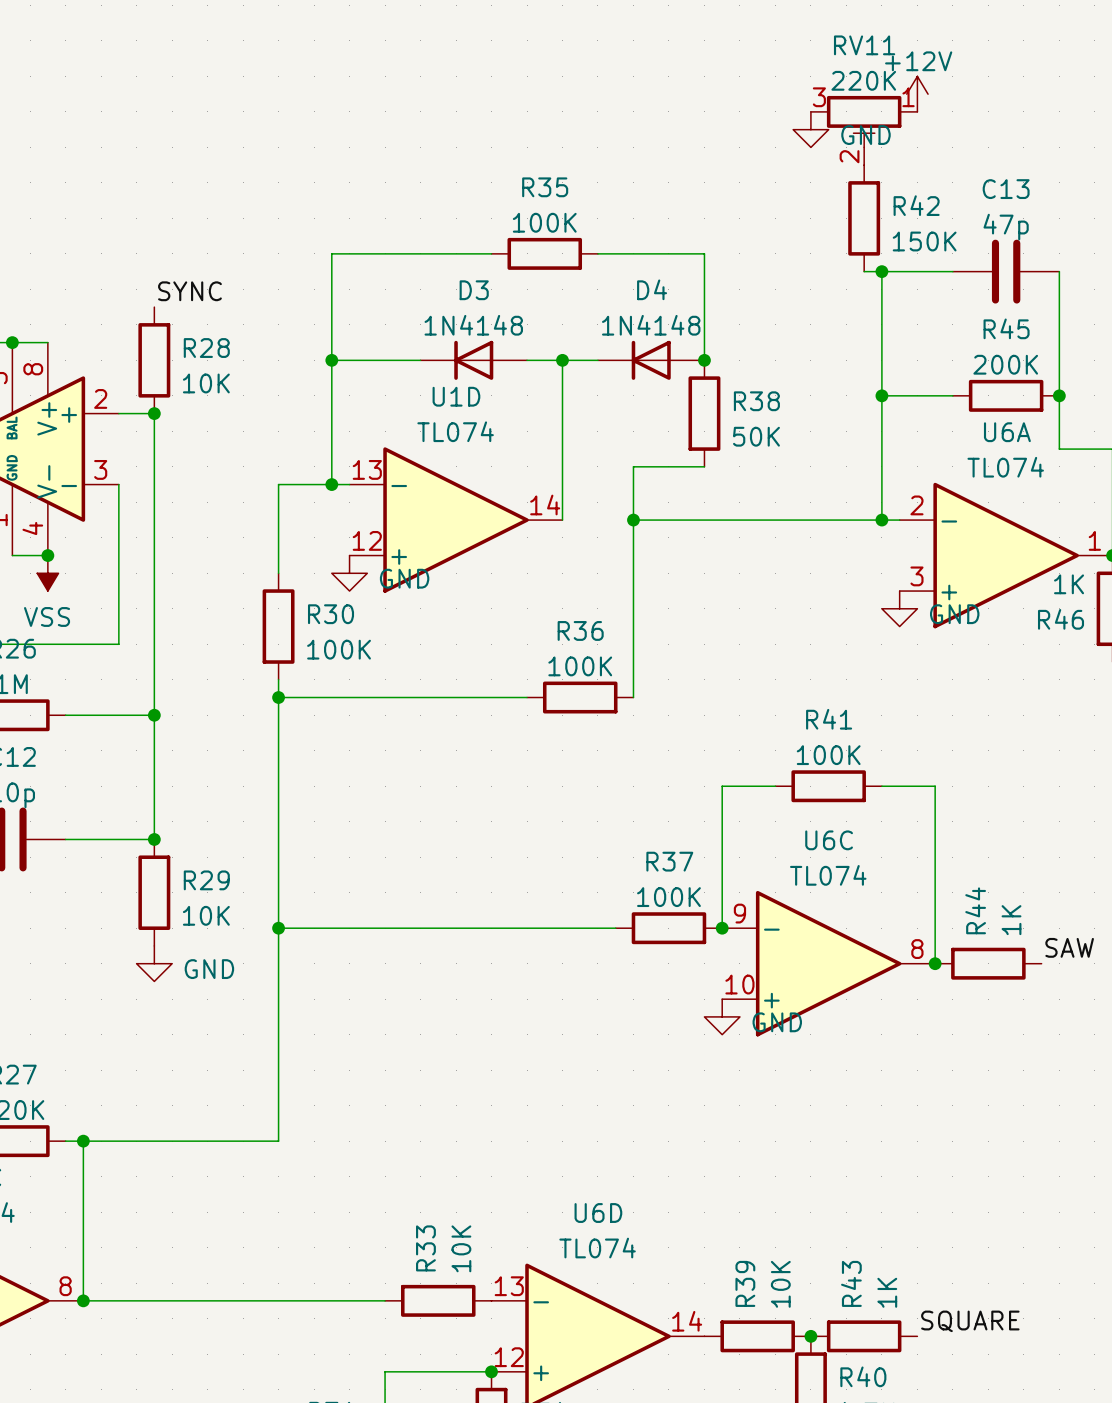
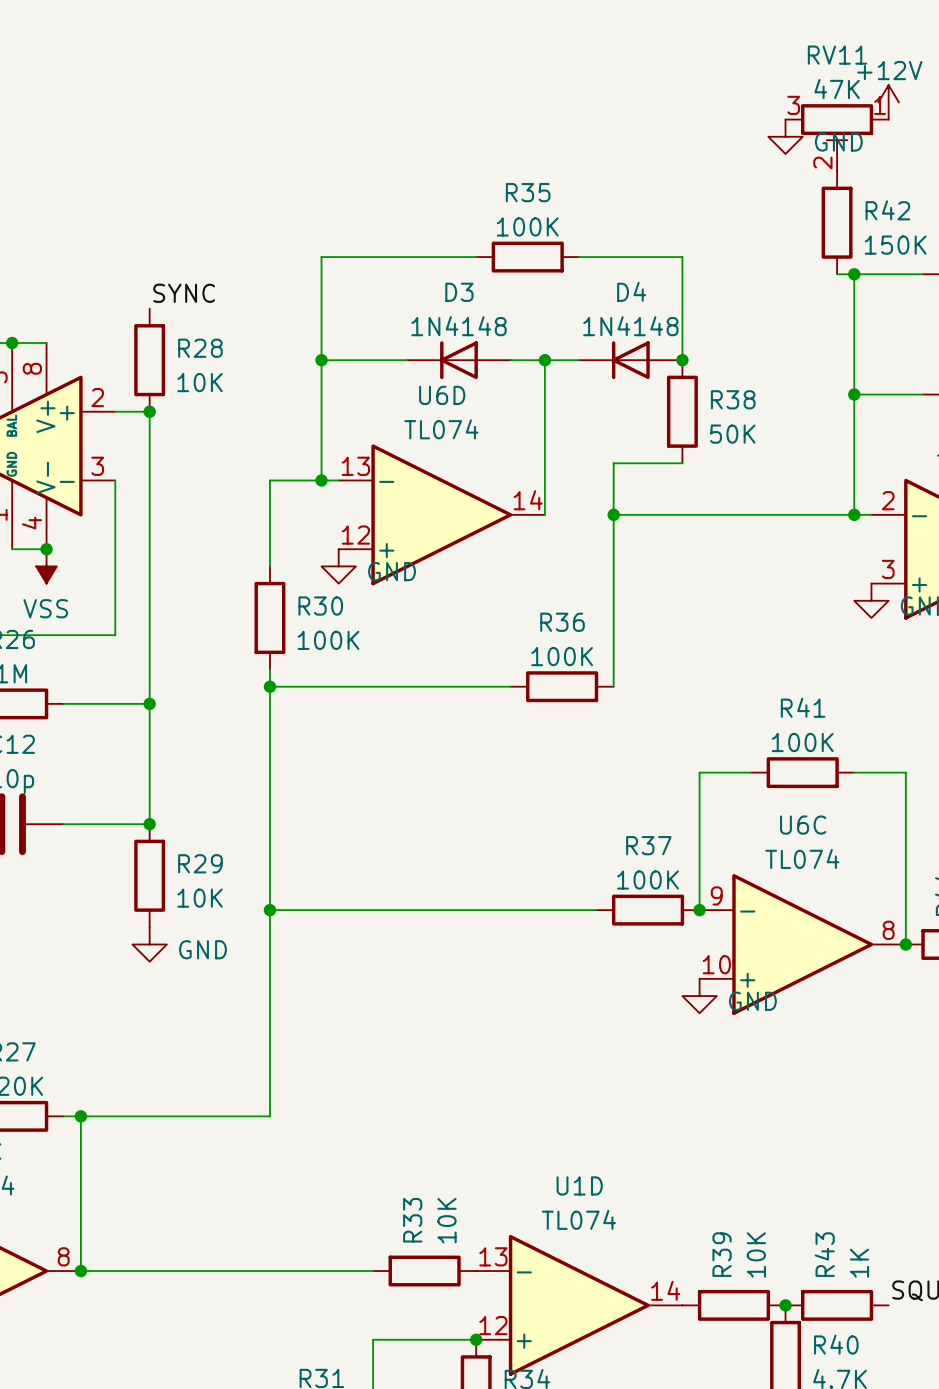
RV11 value: 220K (863, 80) -> 47K (837, 89)
U1D name: U1D (456, 396) -> U6D (442, 395)
U6D name: U6D (598, 1213) -> U1D (579, 1185)

